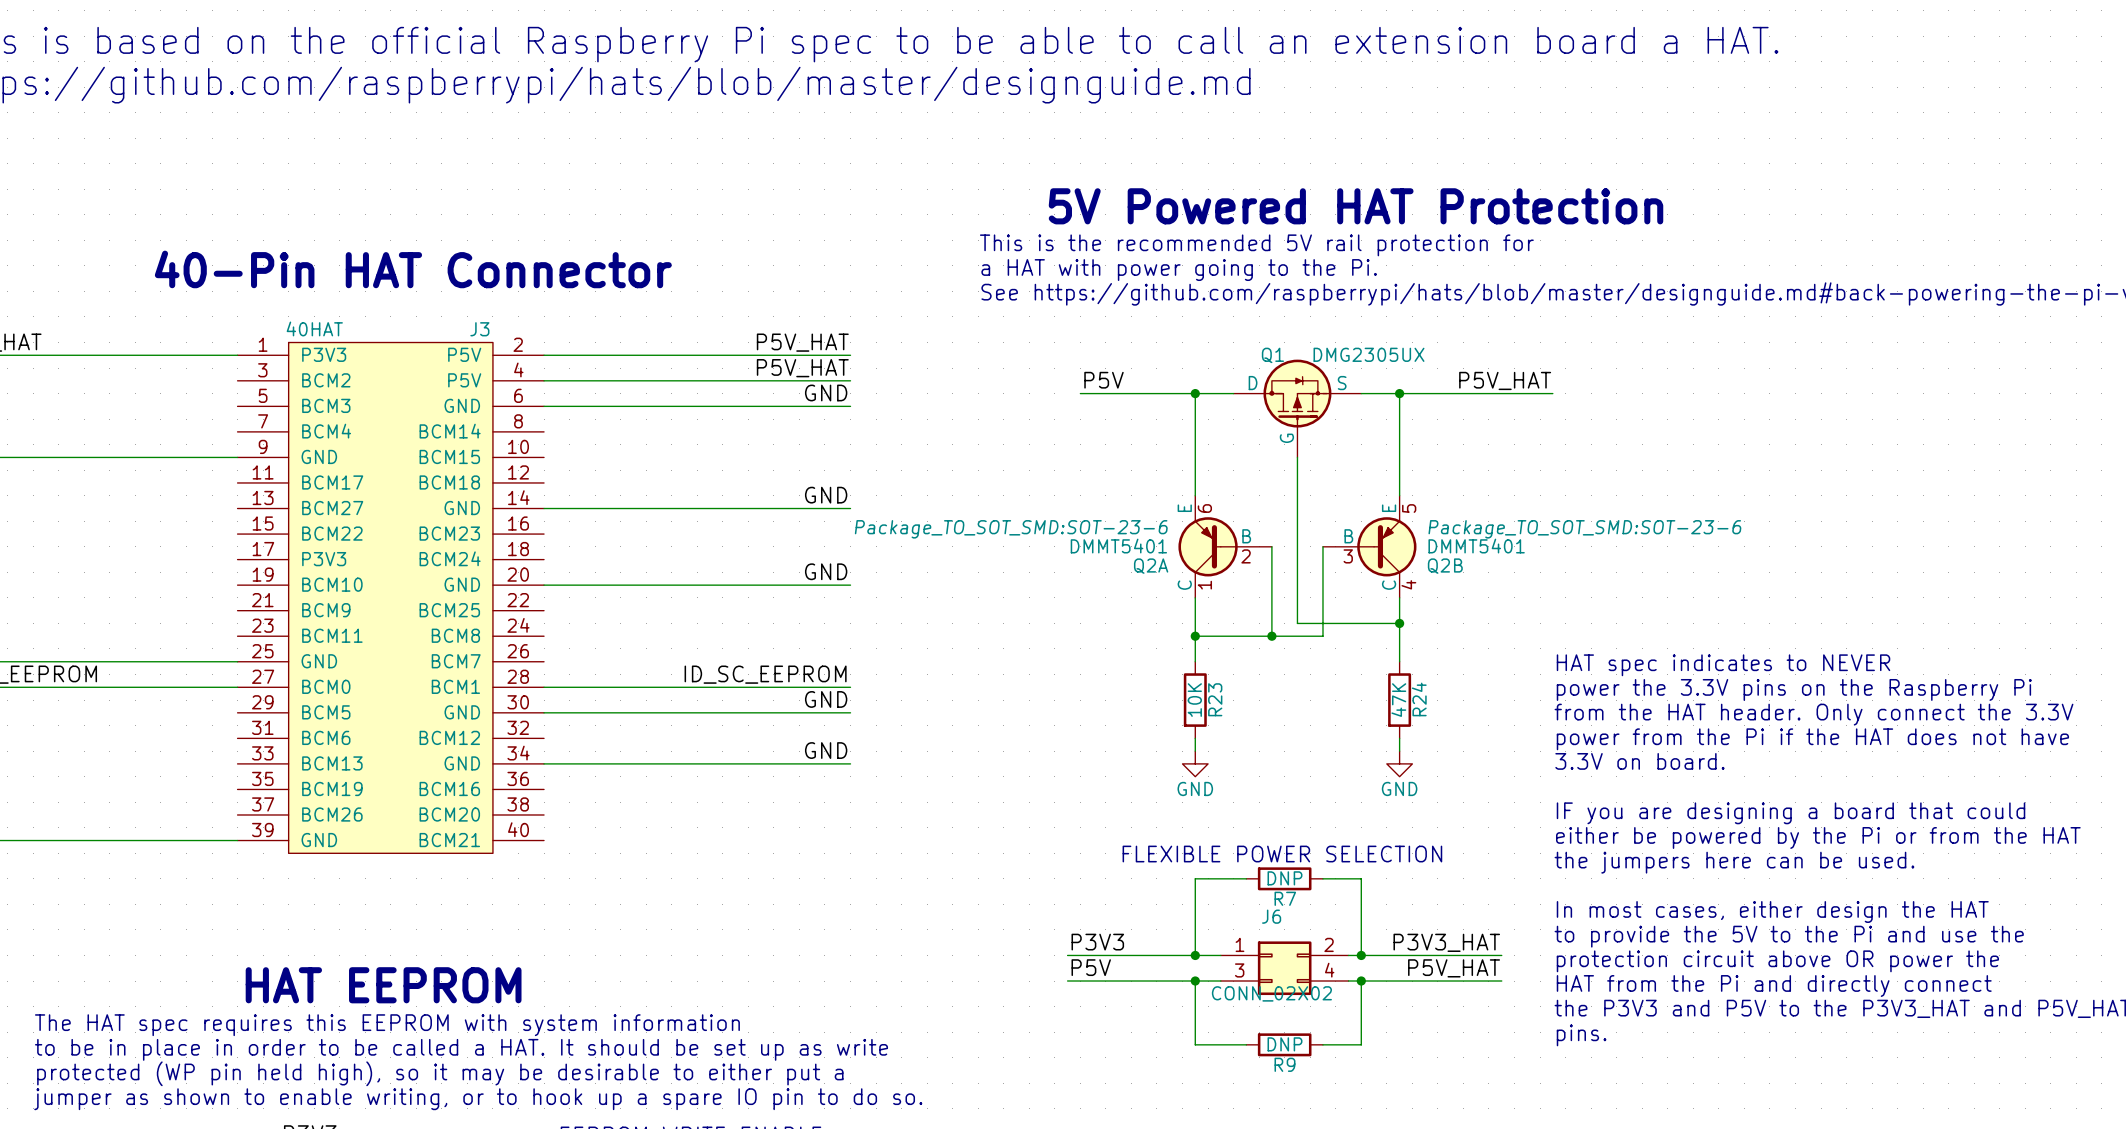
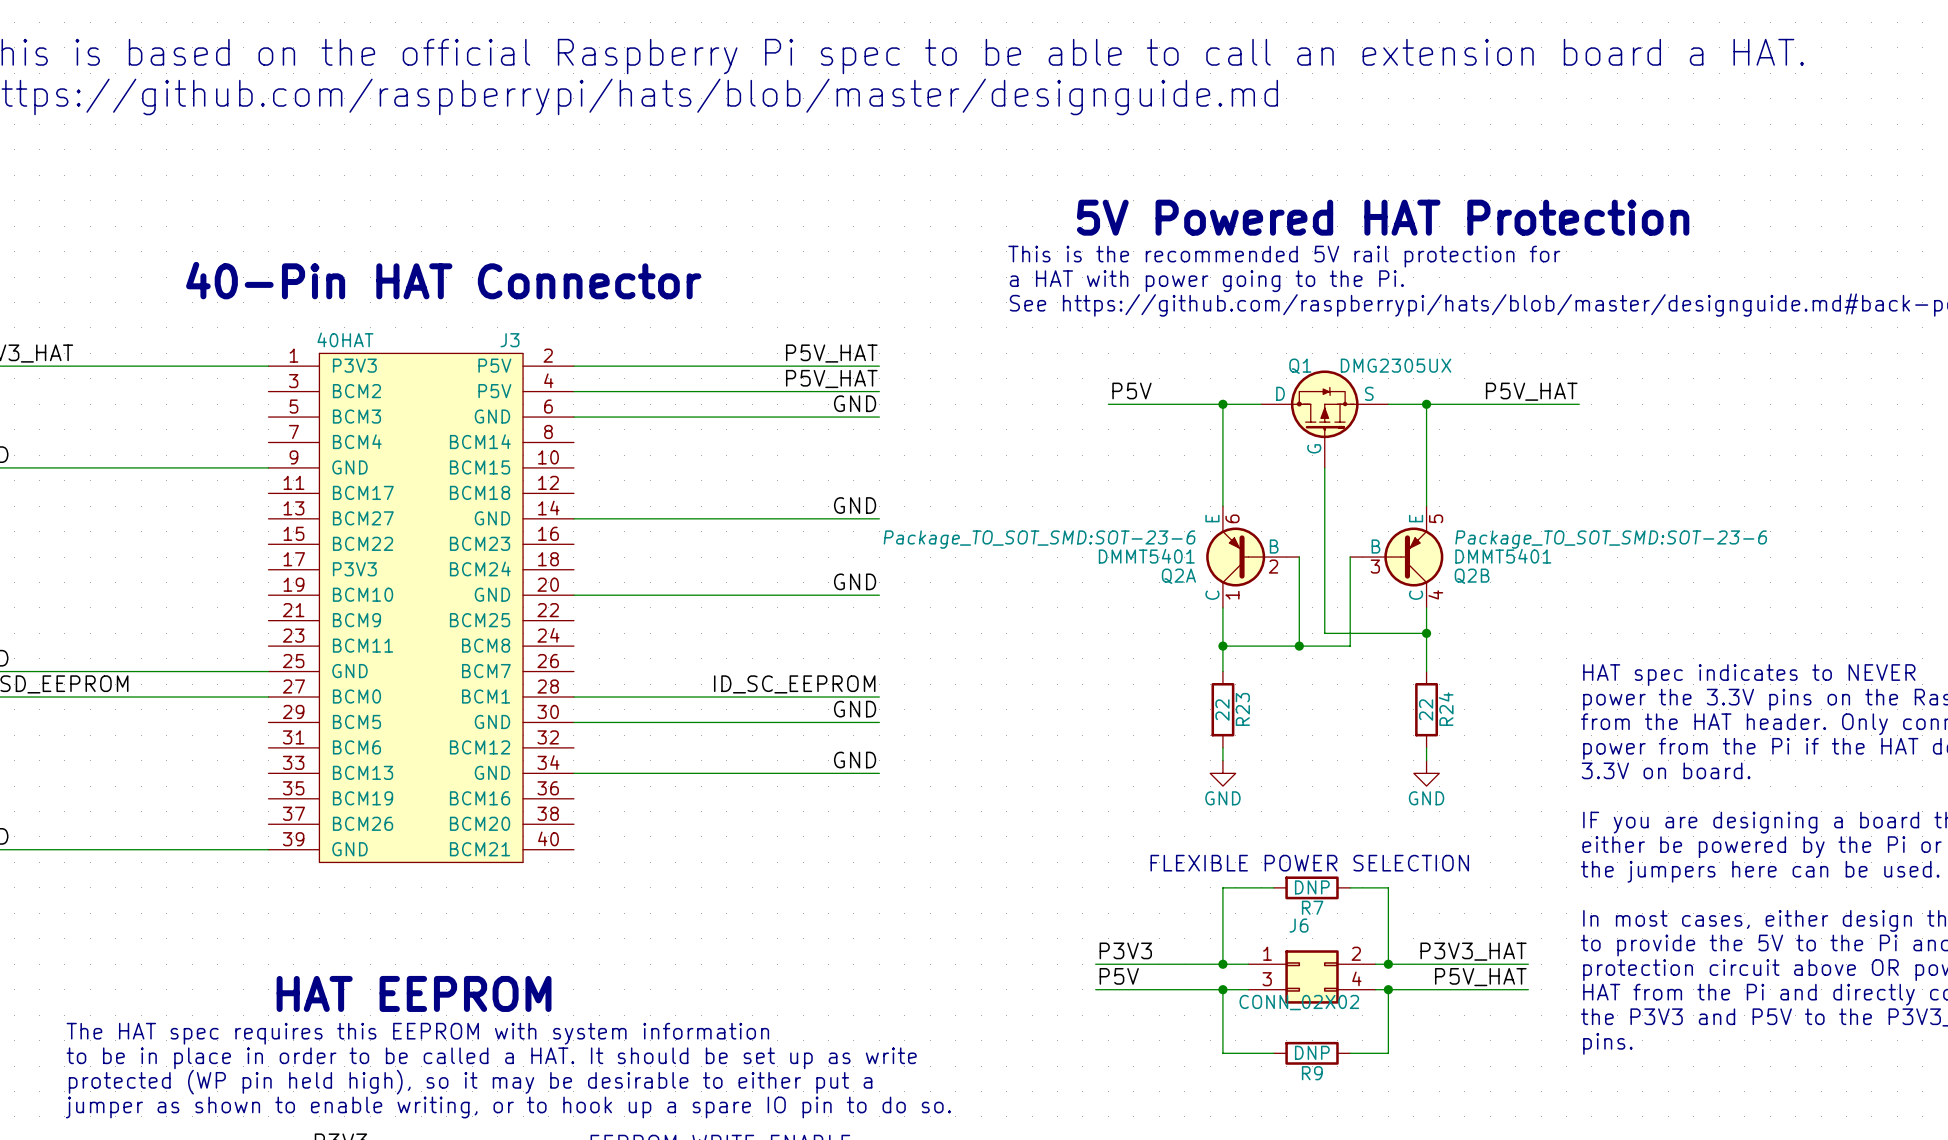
R23 value: 10K (1194, 700) -> 22 (1222, 710)
R24 value: 47K (1398, 700) -> 22 (1426, 710)

